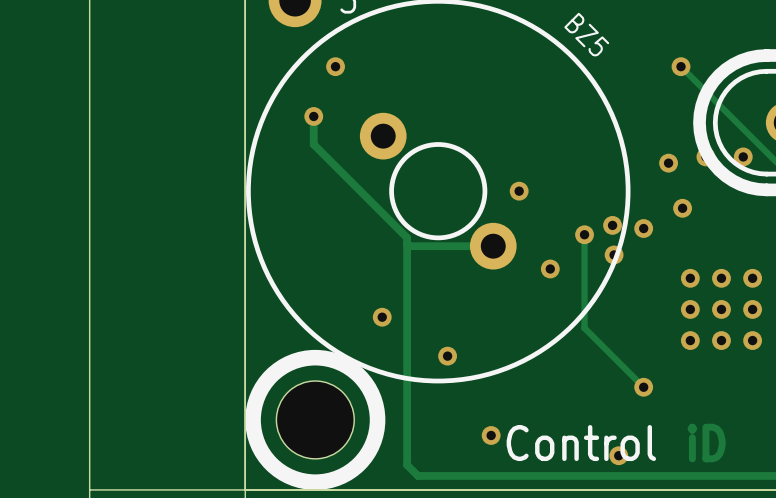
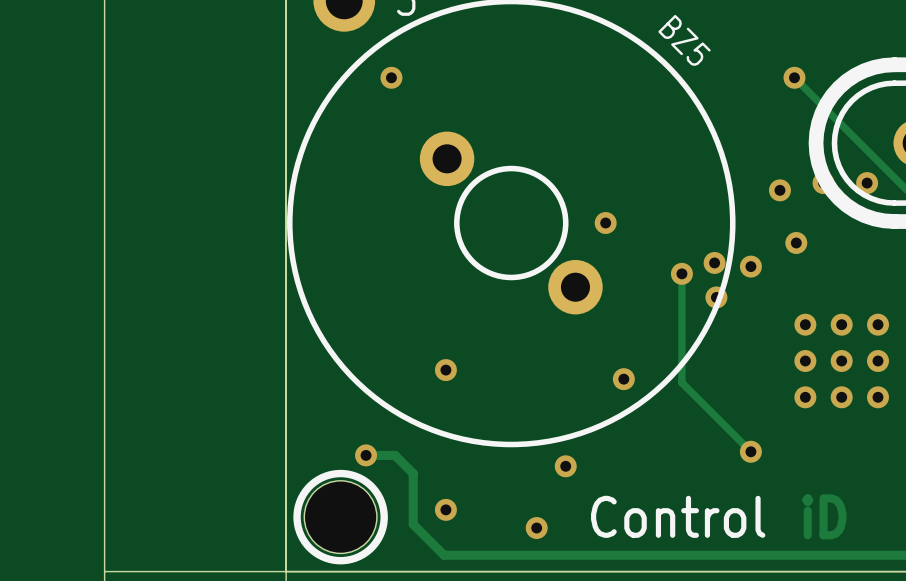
track: (313, 116) (313, 144) (407, 237) (407, 465) (418, 475) -> (366, 455) (395, 455) (413, 473) (413, 524) (444, 555) (487, 555)
via: (313, 116) -> none
track: (407, 244) (409, 246) (493, 246) -> none
via: (550, 268) -> none
via: none -> (623, 379)
drawing: [245, 349, 386, 490] -> none
via: (447, 356) -> none
via: none -> (366, 455)
via: none -> (565, 466)
drawing: none -> [293, 469, 388, 565]
hole: (315, 419) -> none
via: (491, 435) -> none
via: none -> (445, 509)
hole: none -> (340, 517)
via: none -> (536, 528)
via: (618, 455) -> none

